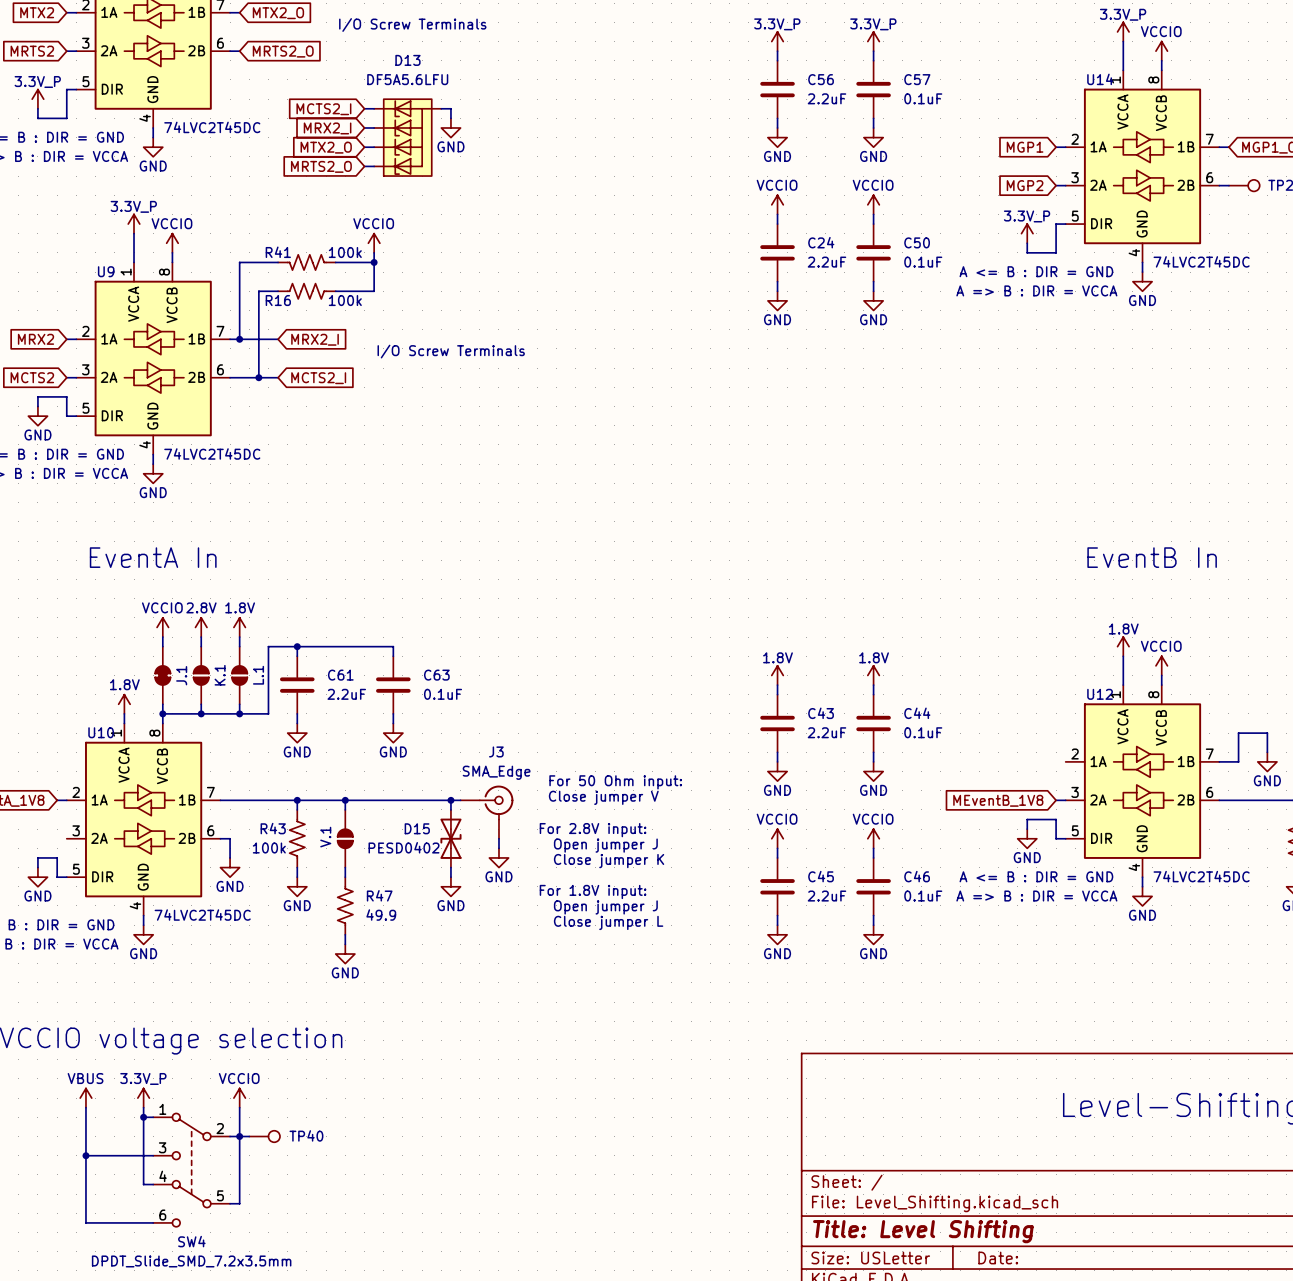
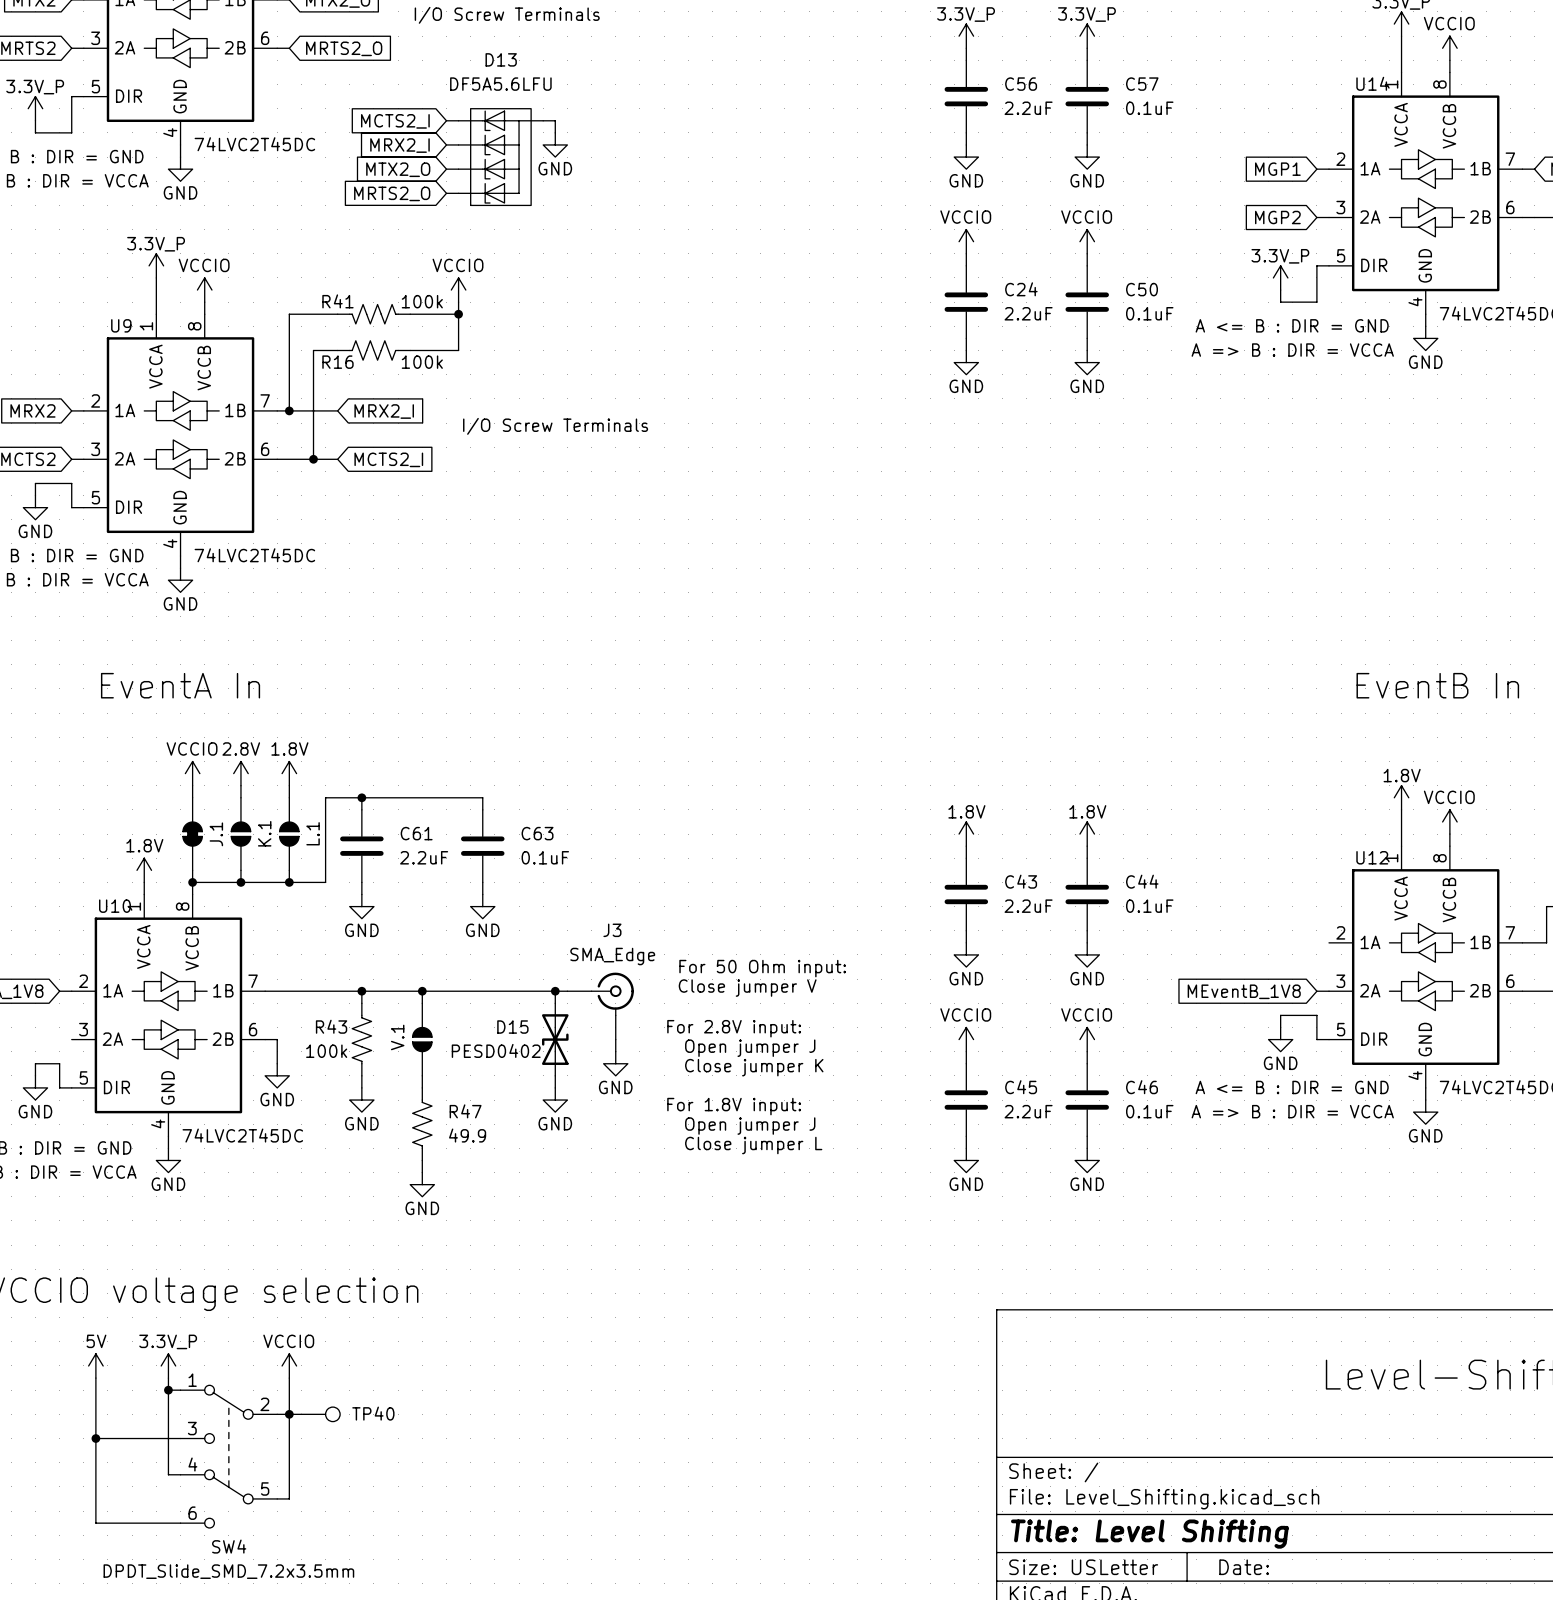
power symbol: VBUS (85, 1098) -> 5V (95, 1365)

